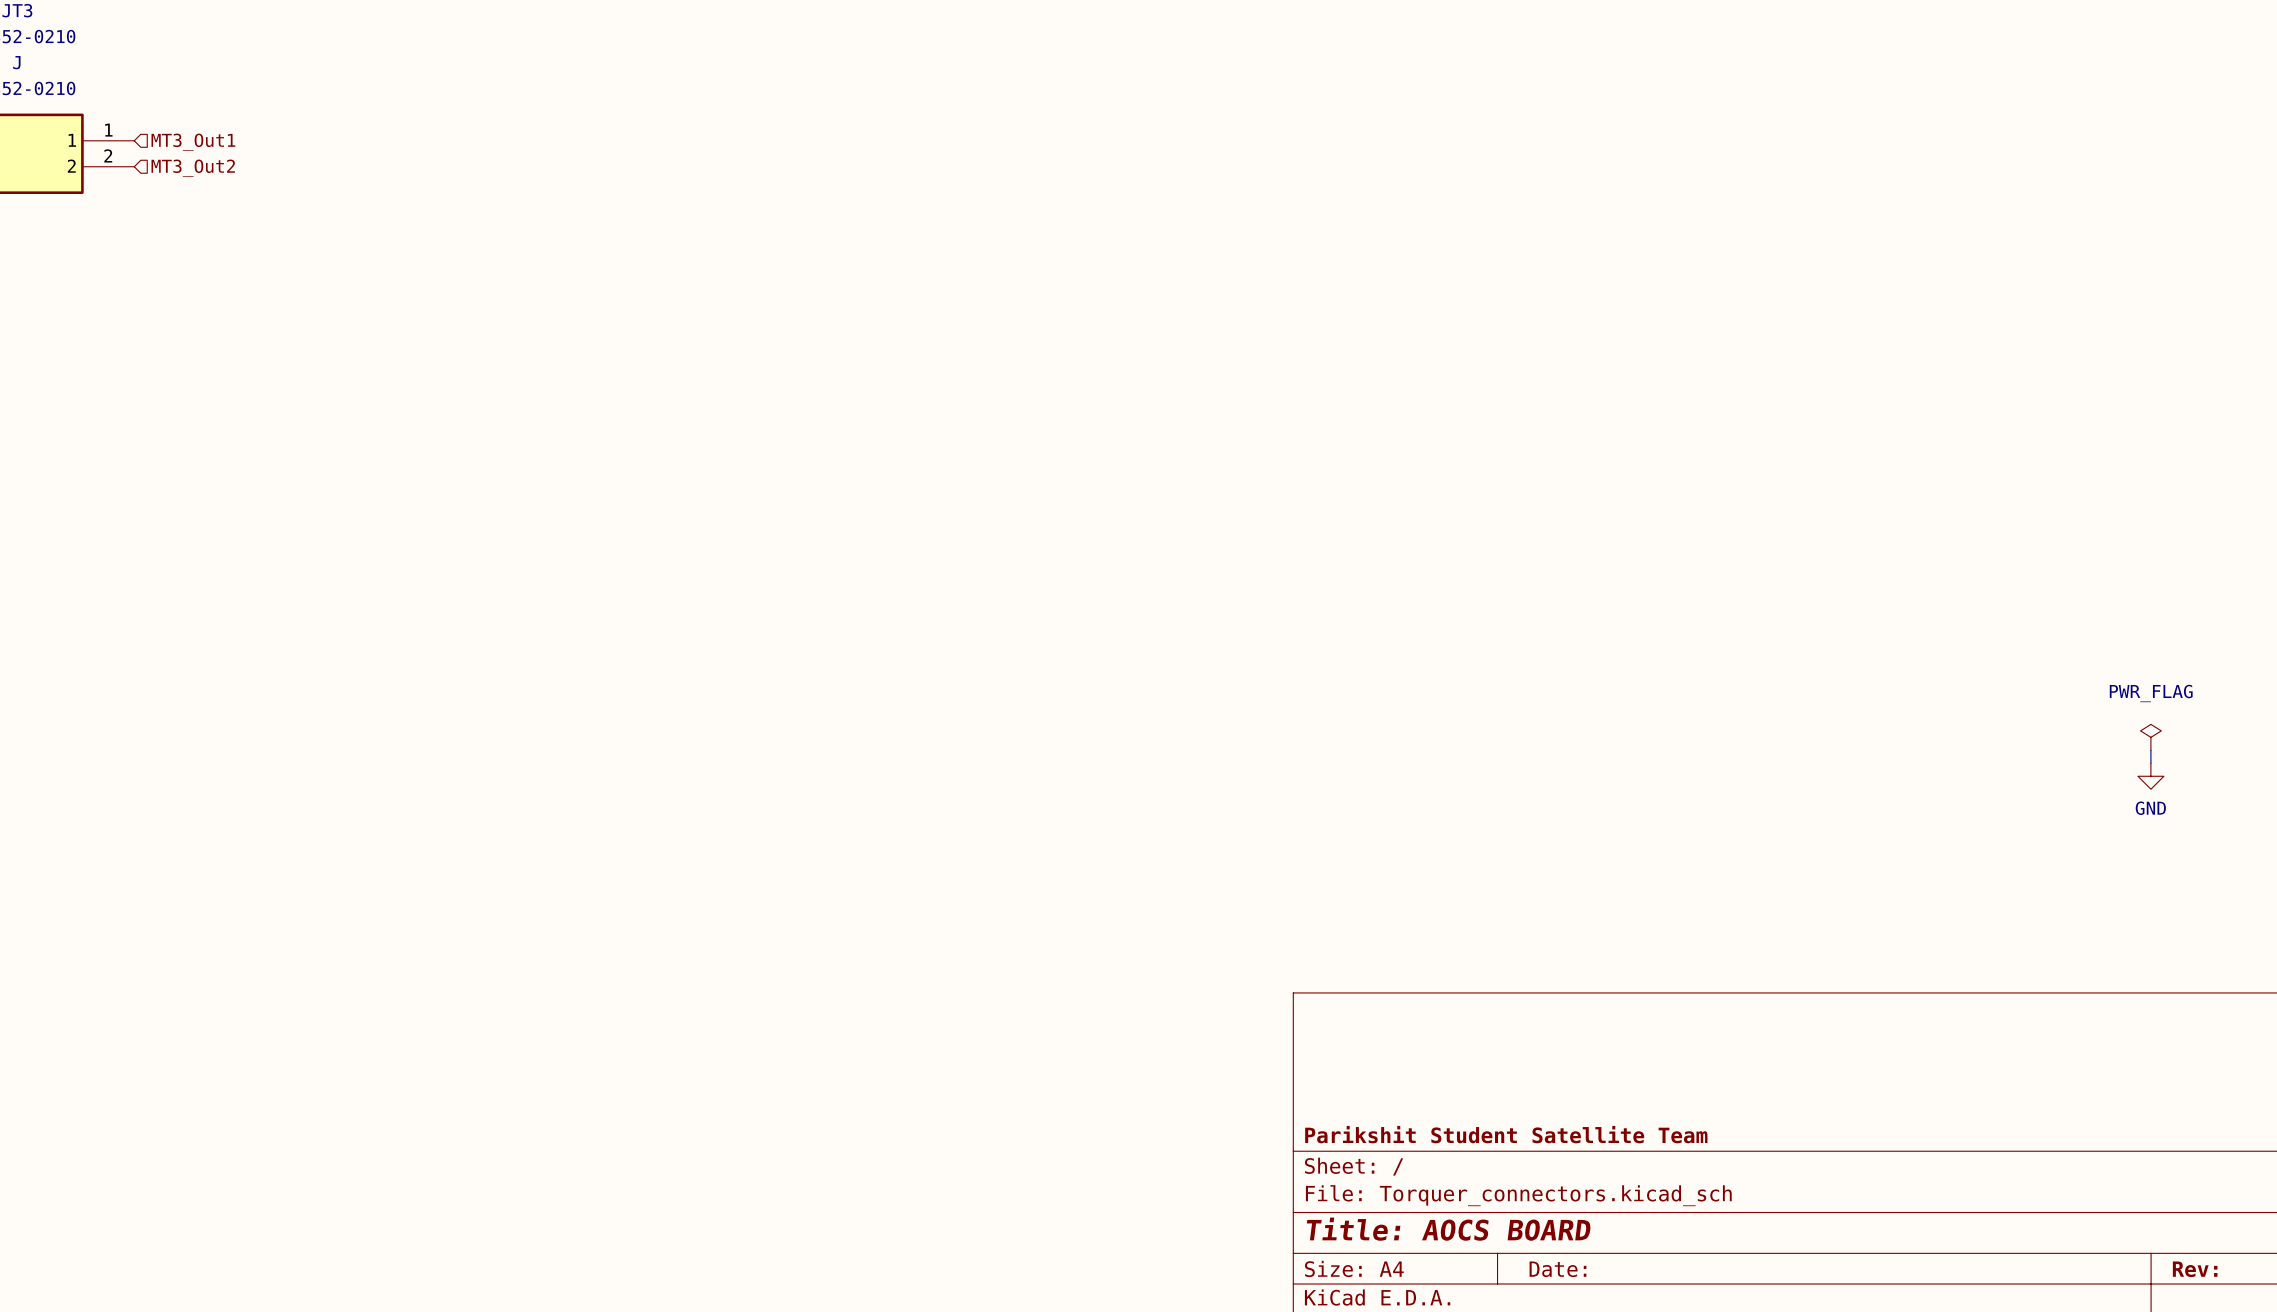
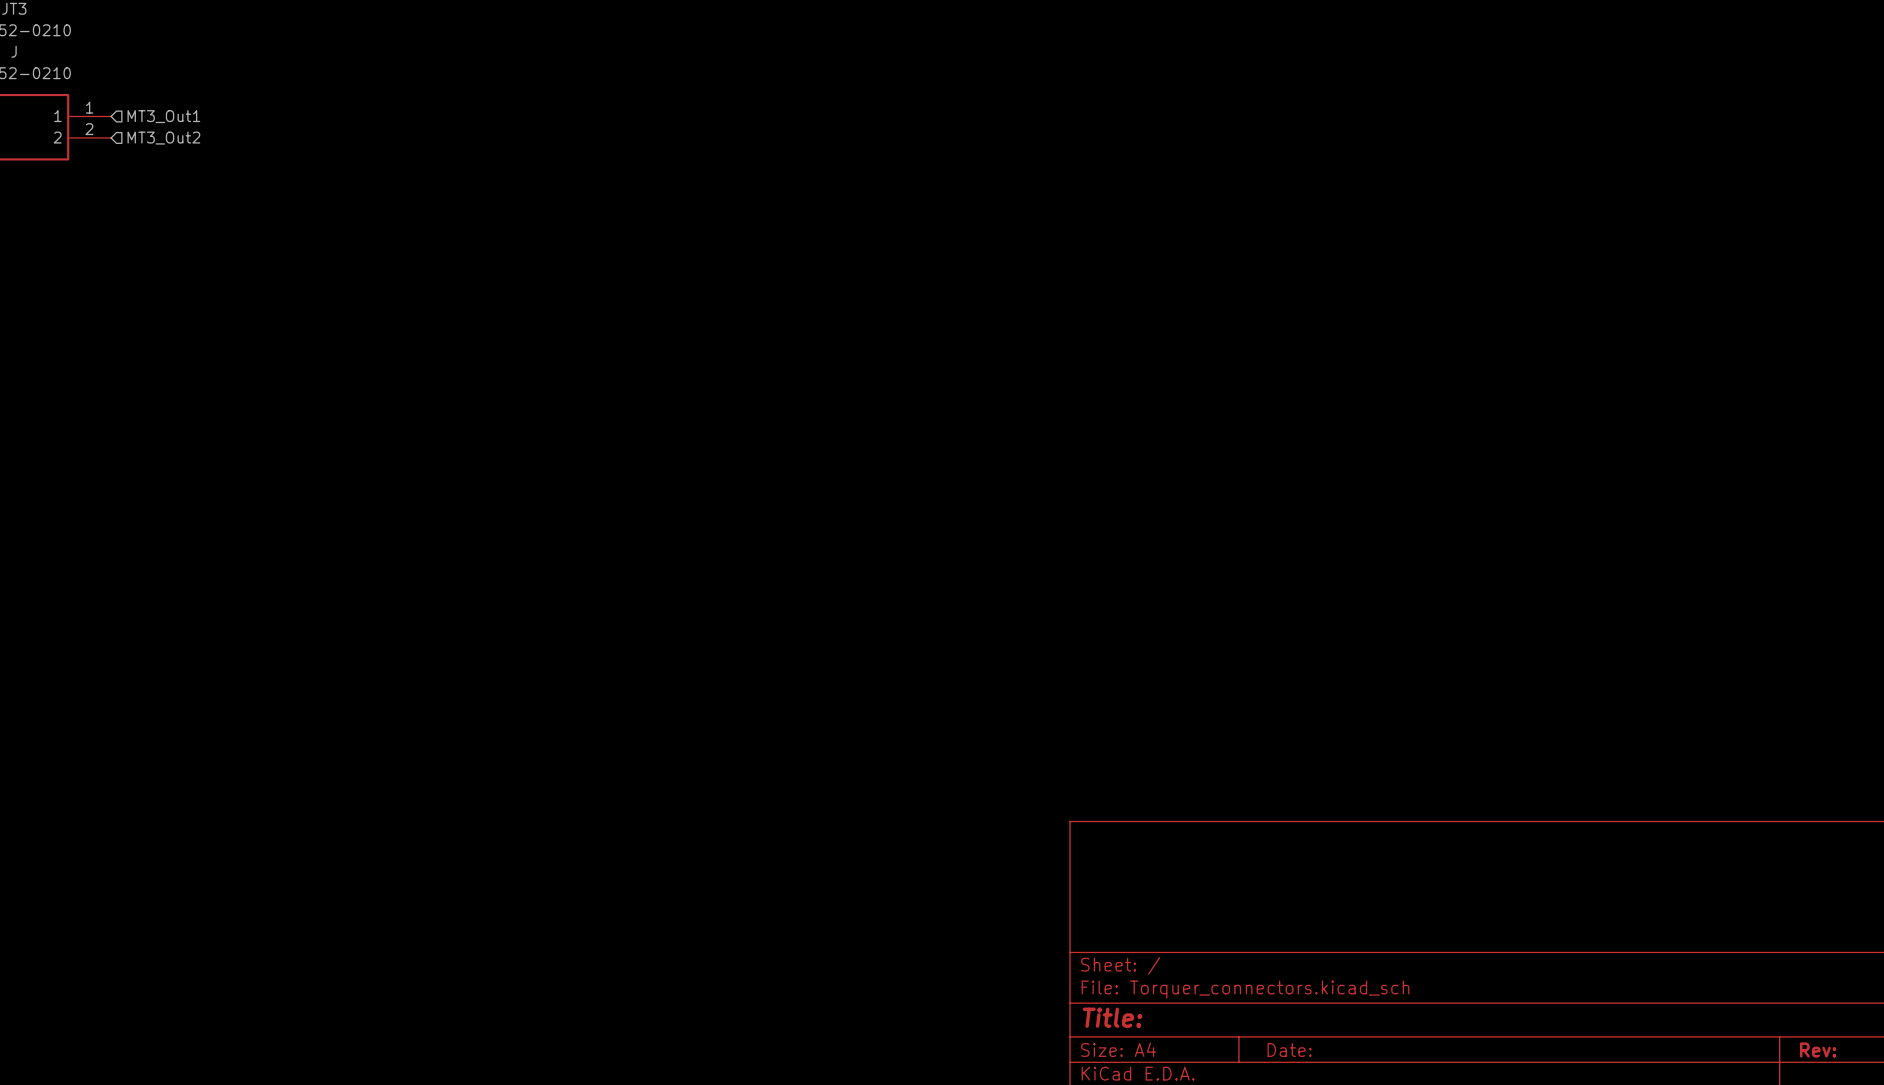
power symbol: PWR_FLAG (2150, 737) -> none
wire: (2150, 750) (2150, 763) -> none
power symbol: GND (2150, 776) -> none
title block: Parikshit Student Satellite Team (1506, 1134) -> none
title block: Title: AOCS BOARD (1448, 1229) -> Title: (1112, 1017)

